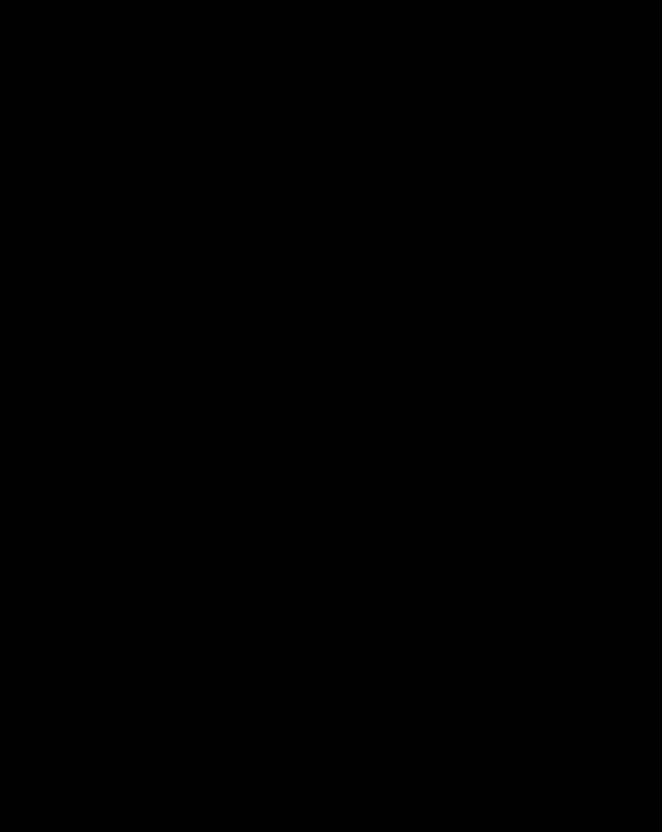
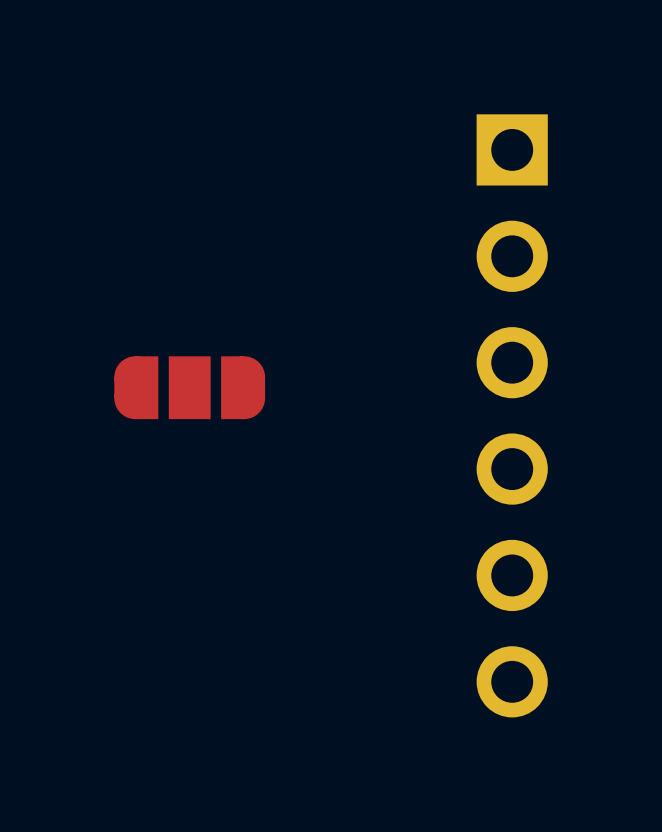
part: none -> (189, 387)
part: none -> (512, 415)

